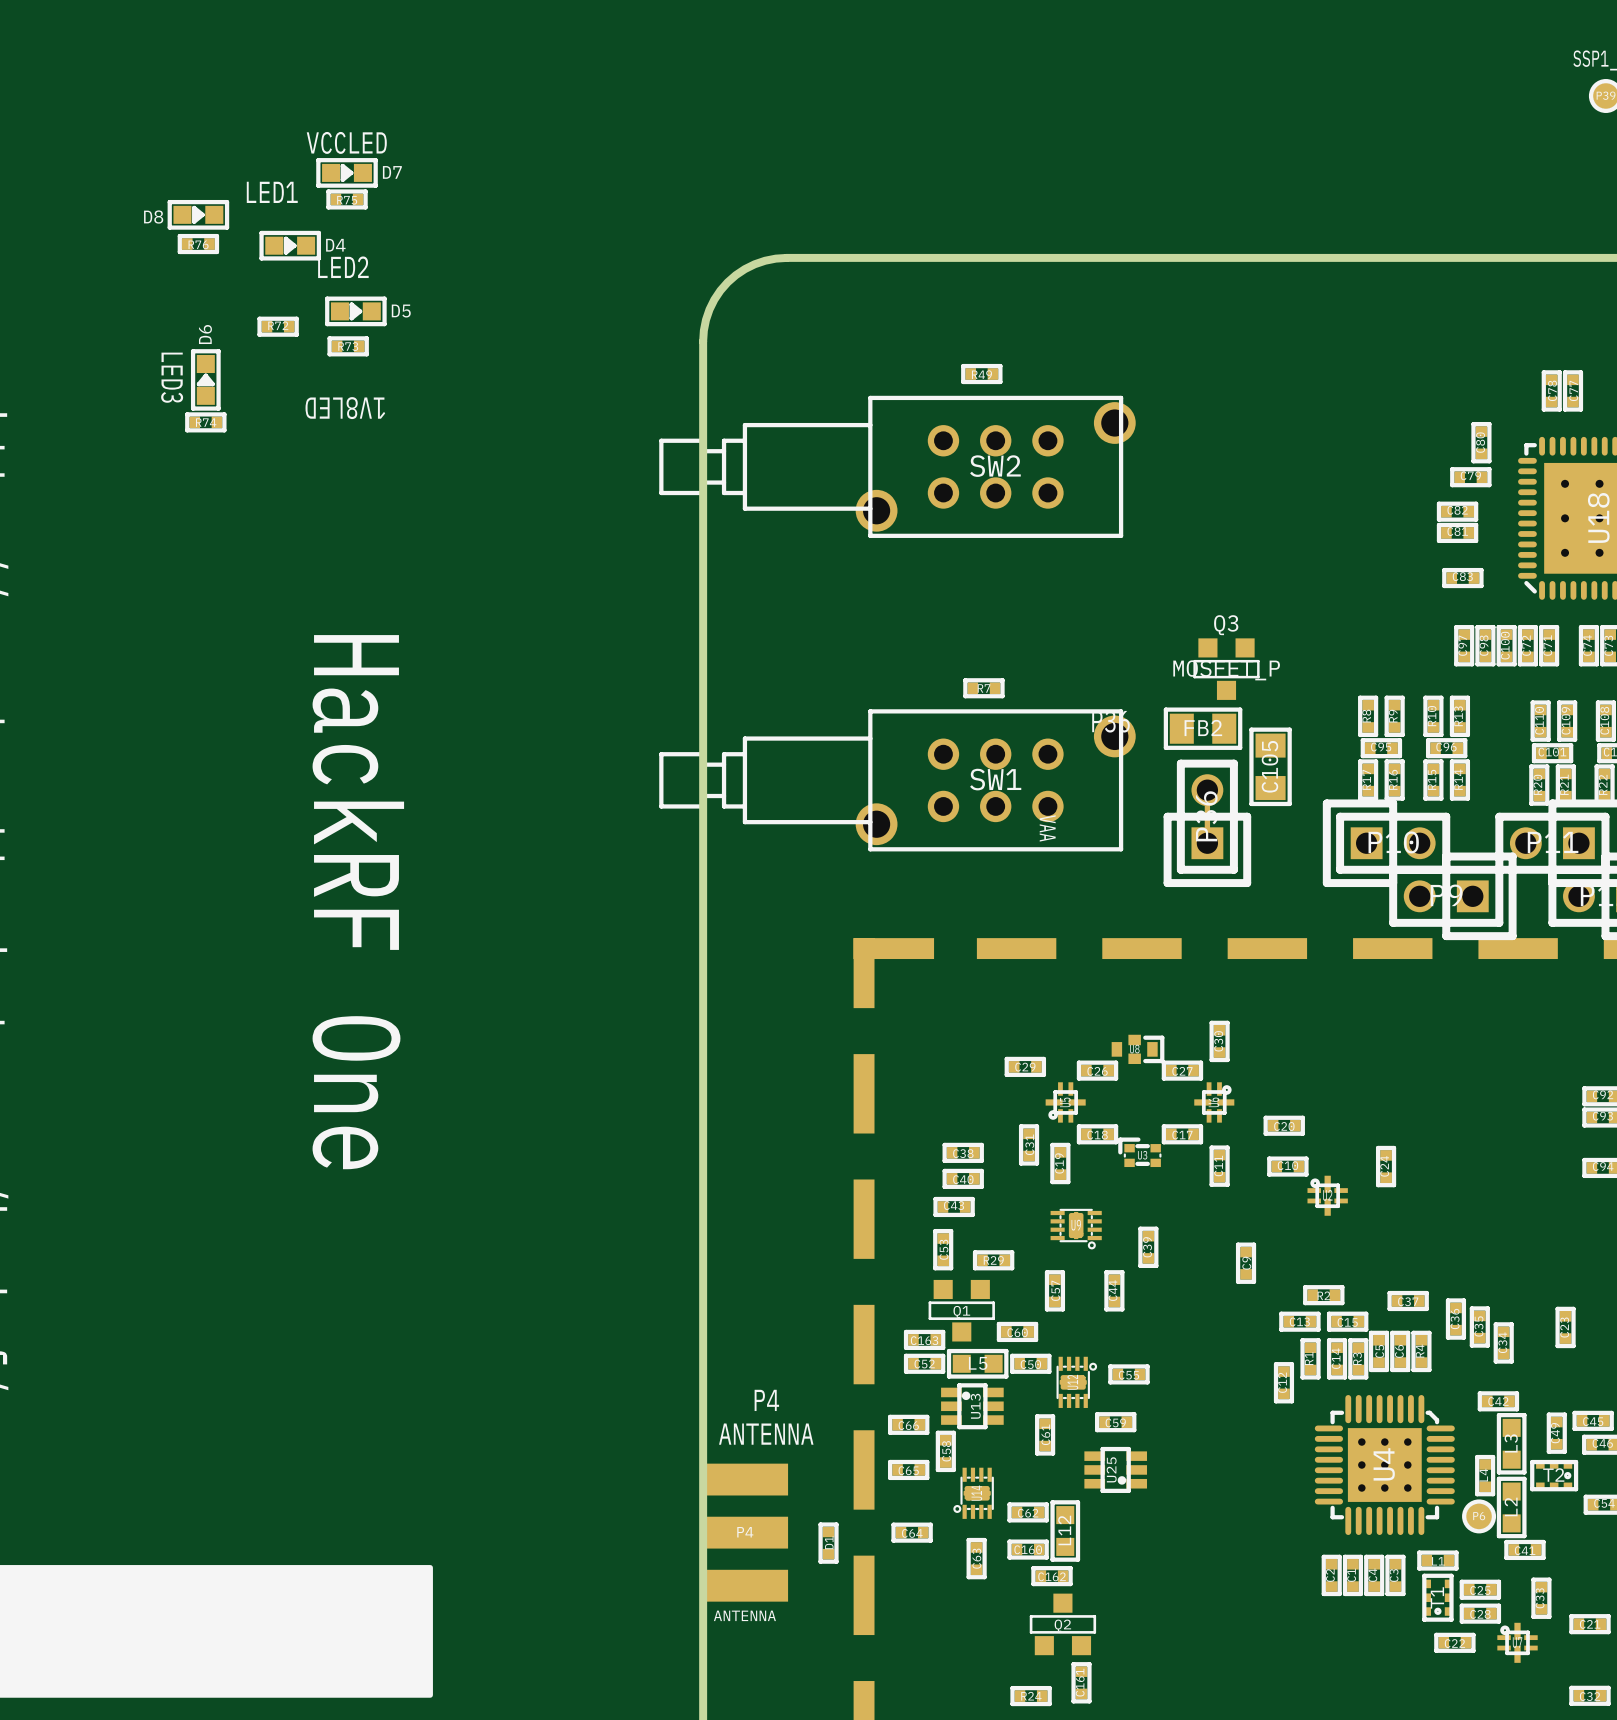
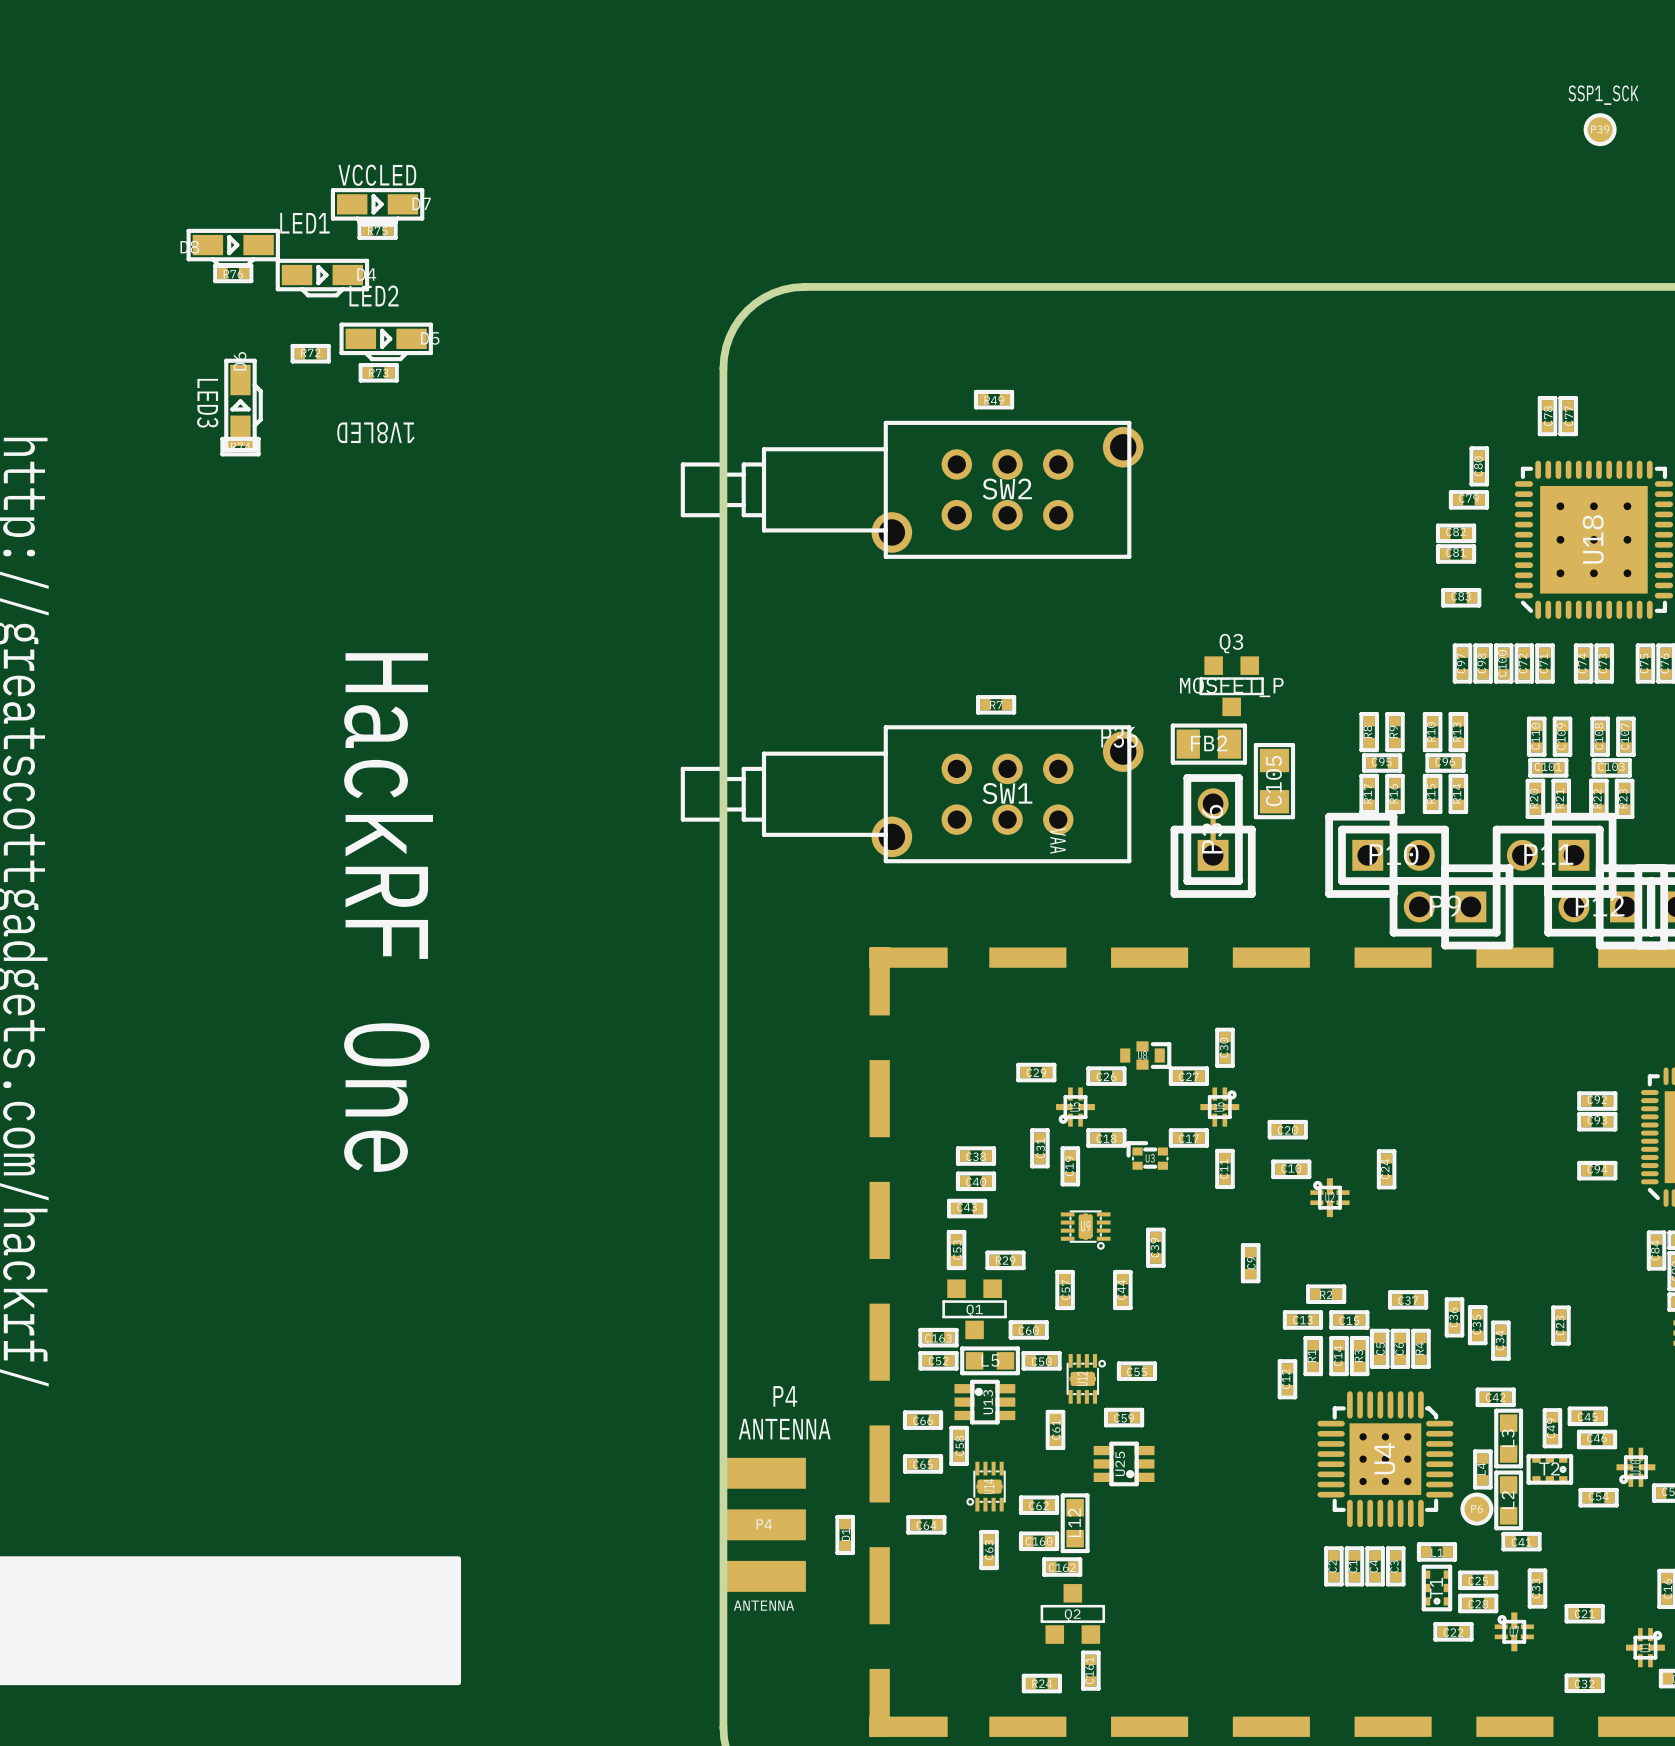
D7 footprint: [316, 158, 378, 188] -> [330, 188, 425, 227]
D8 footprint: [167, 199, 230, 230] -> [186, 228, 280, 268]
D4 footprint: [259, 230, 321, 261] -> [275, 258, 370, 298]
D5 footprint: [325, 296, 387, 327] -> [339, 322, 433, 362]
D6 footprint: [190, 349, 221, 411] -> [224, 358, 263, 453]

